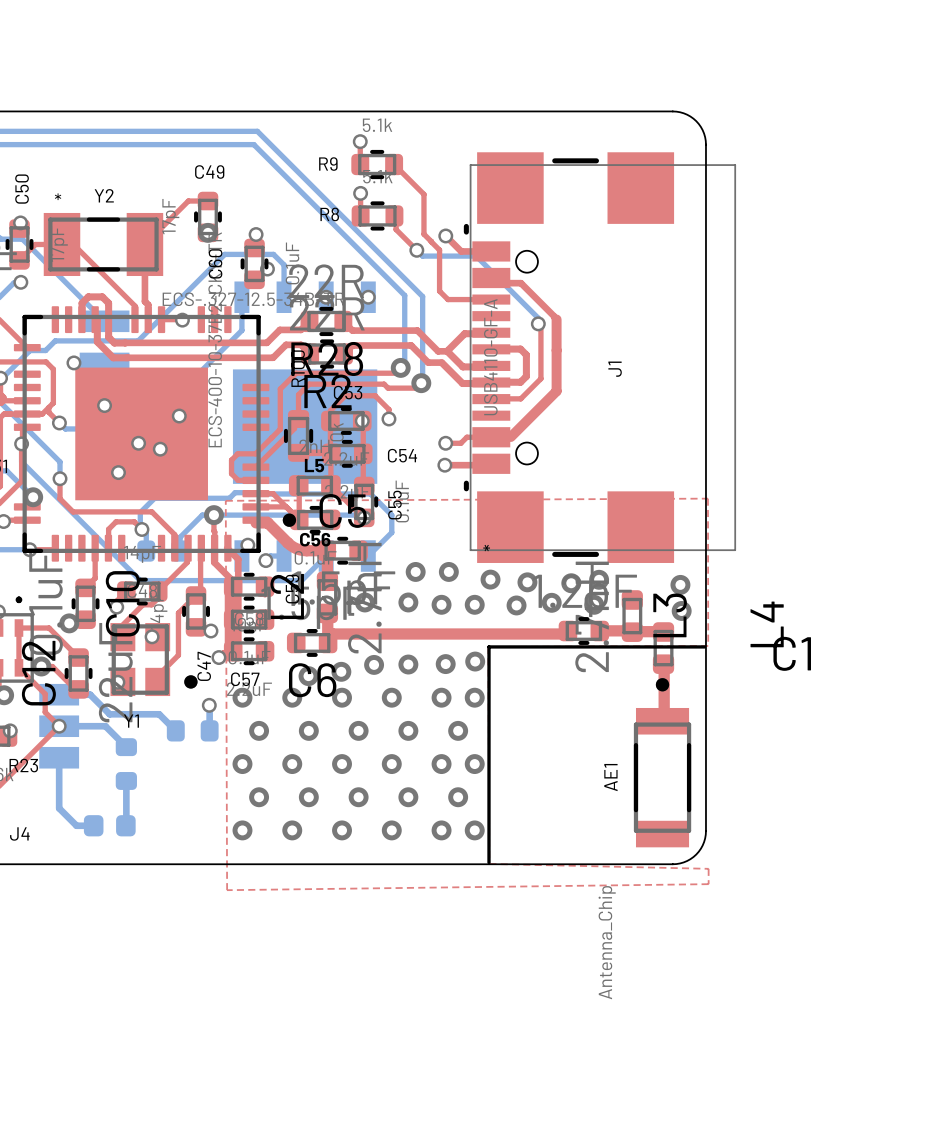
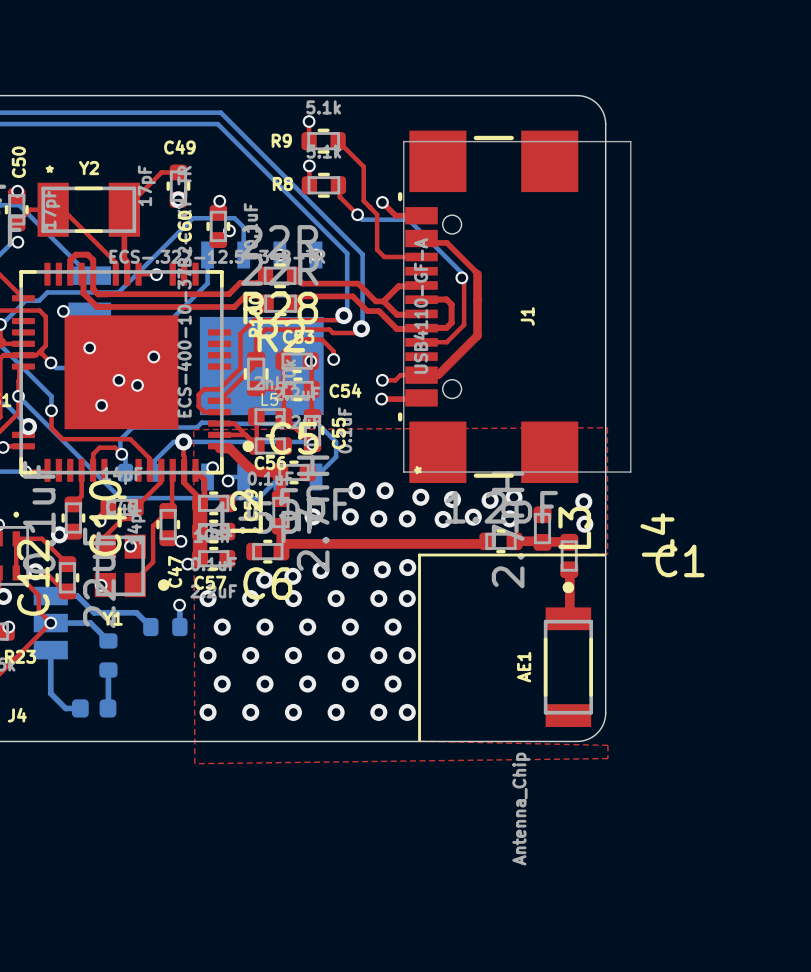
via position: (21, 443) -> (18, 396)

